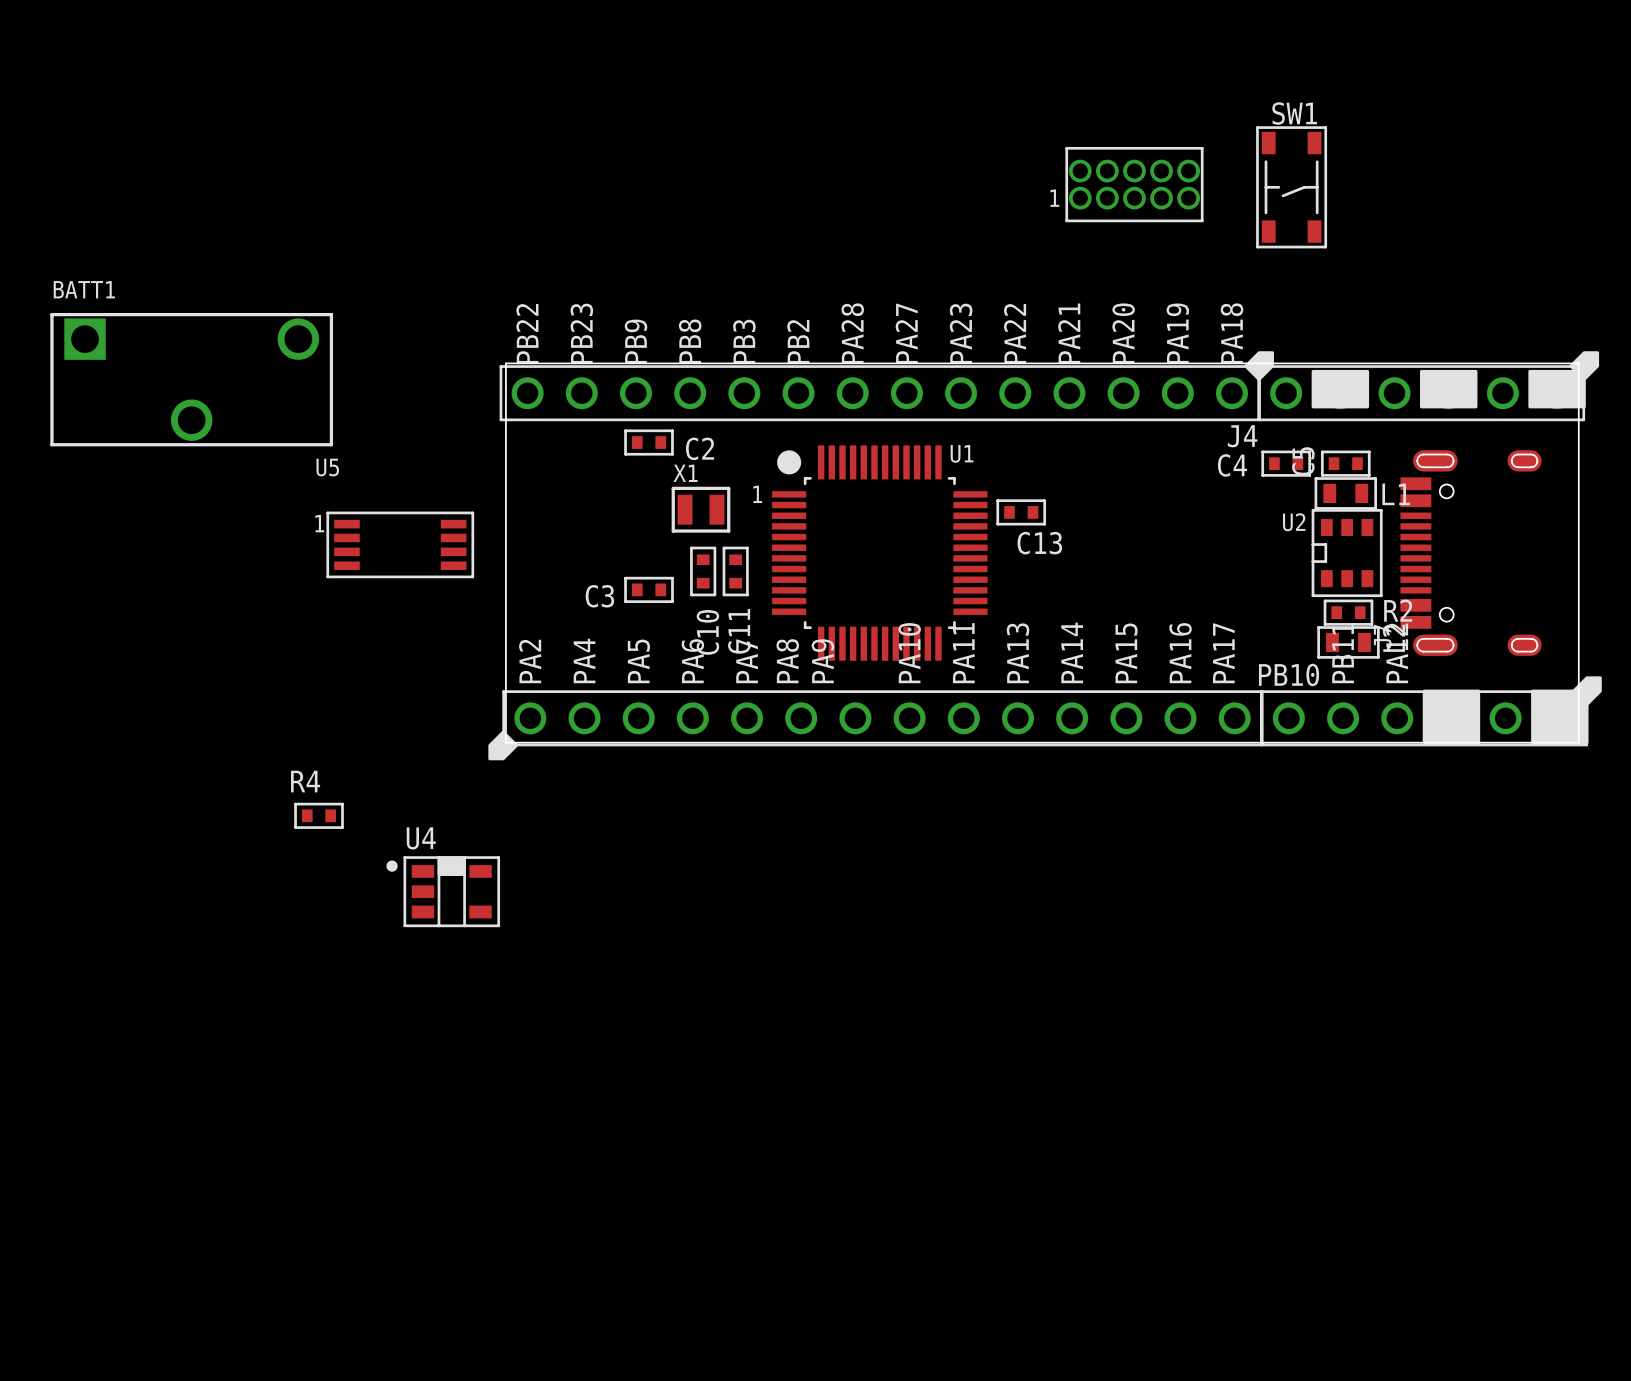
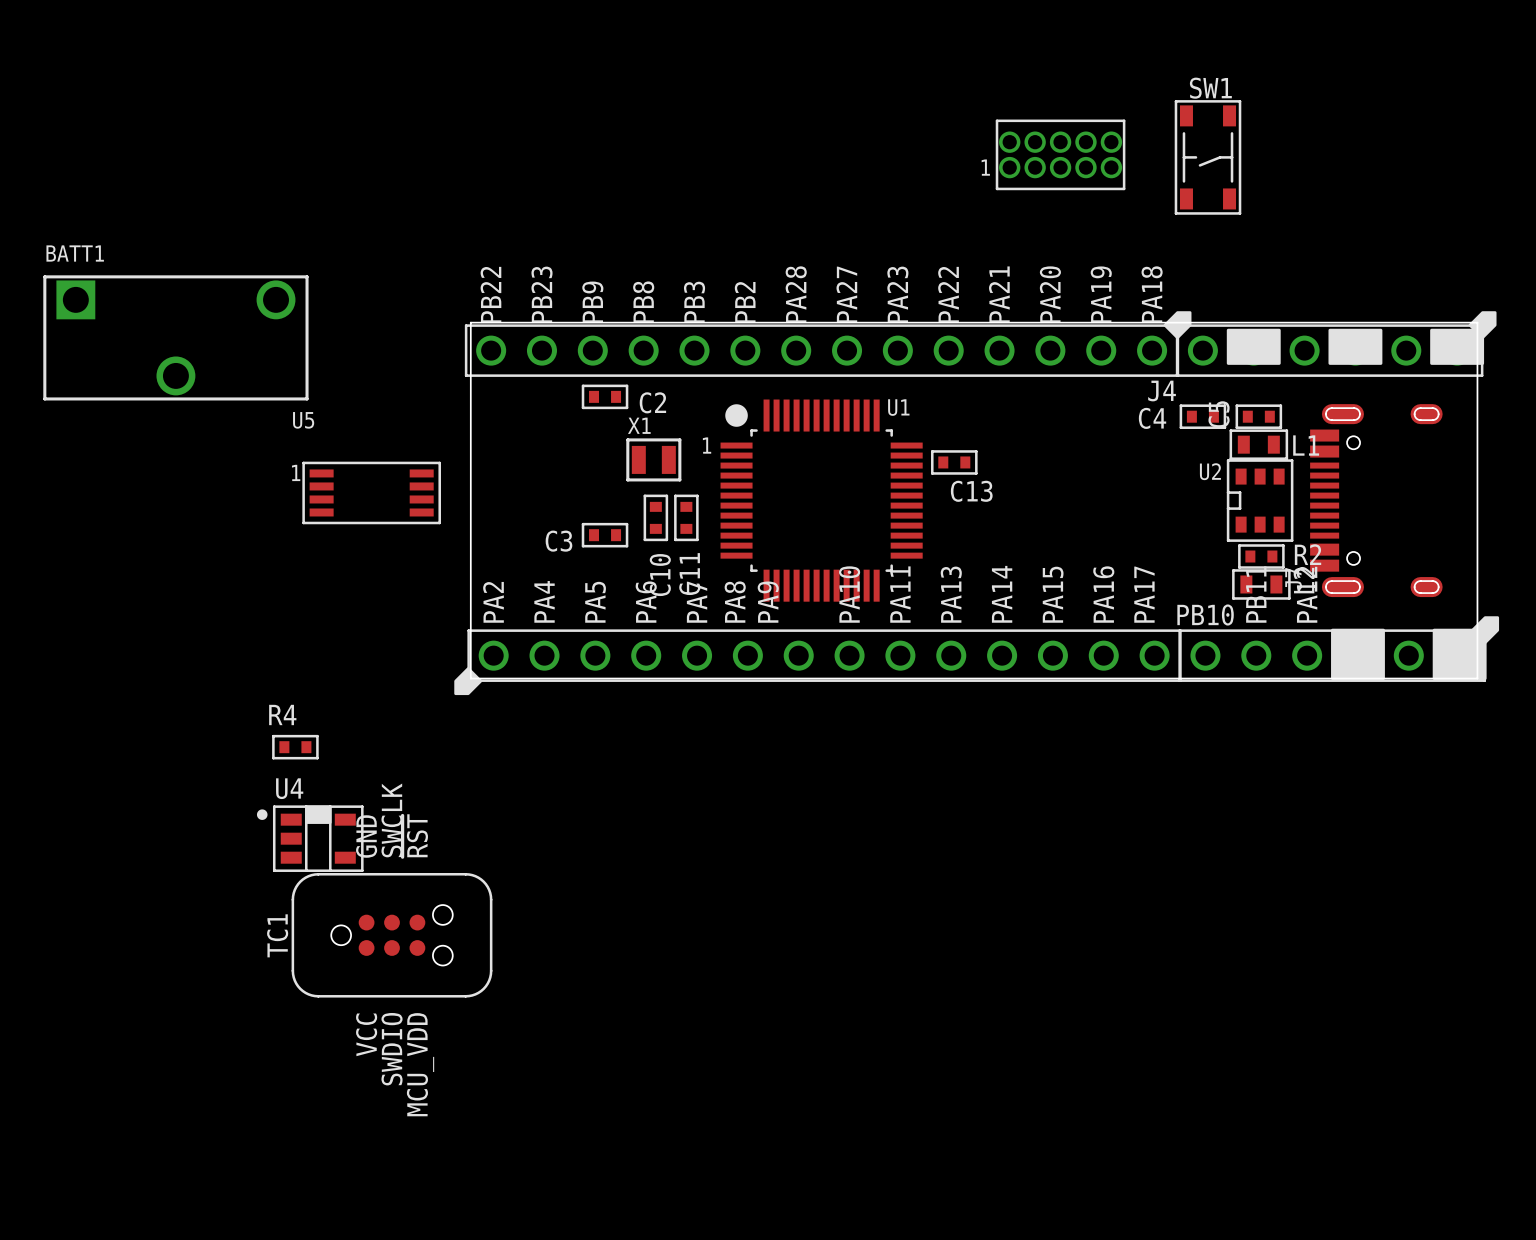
U4 position: (443, 891) -> (310, 838)
TC1: none -> (392, 935)

